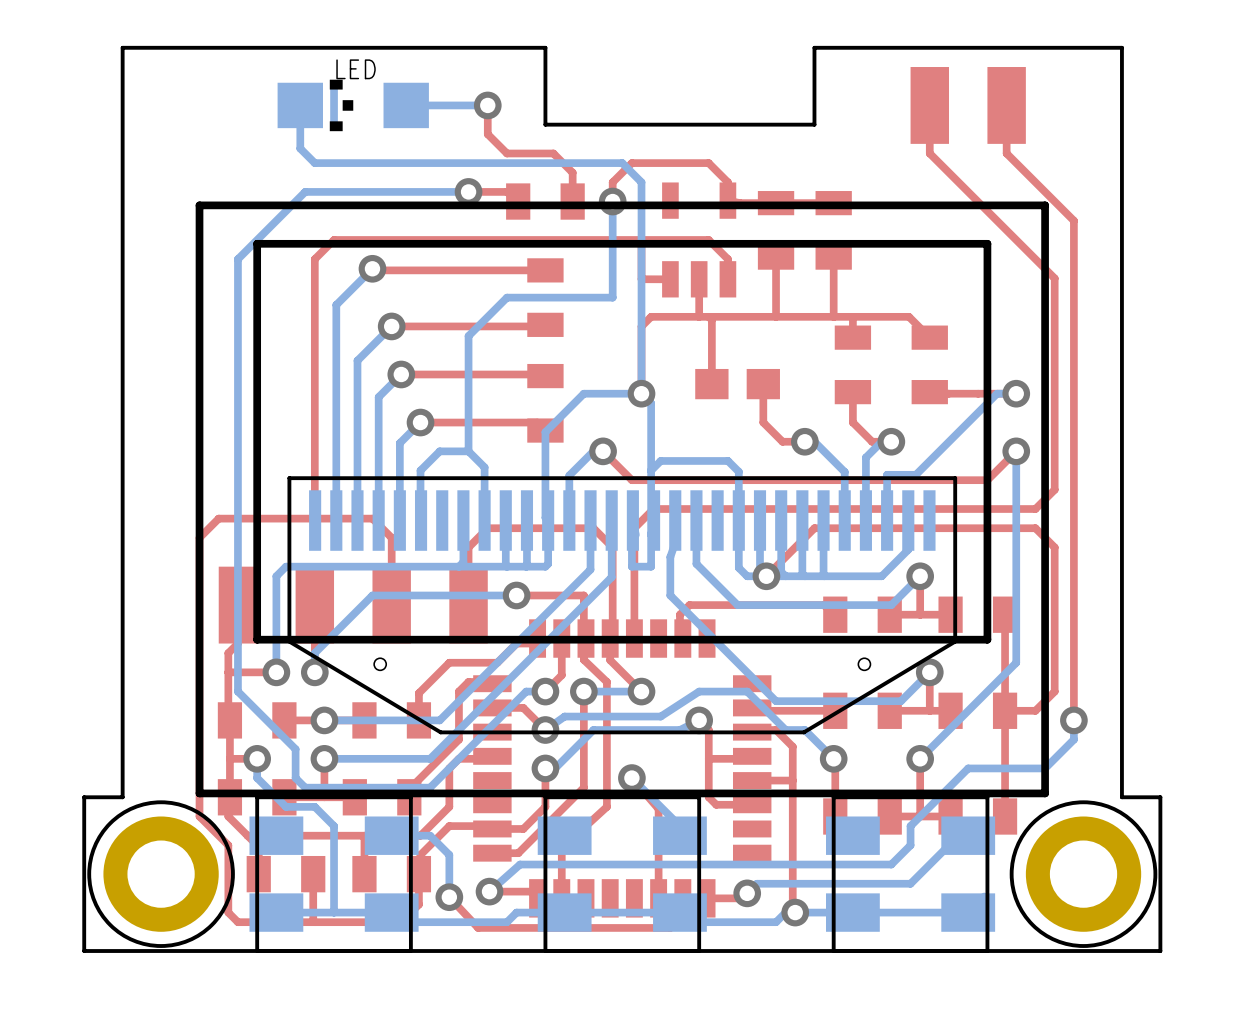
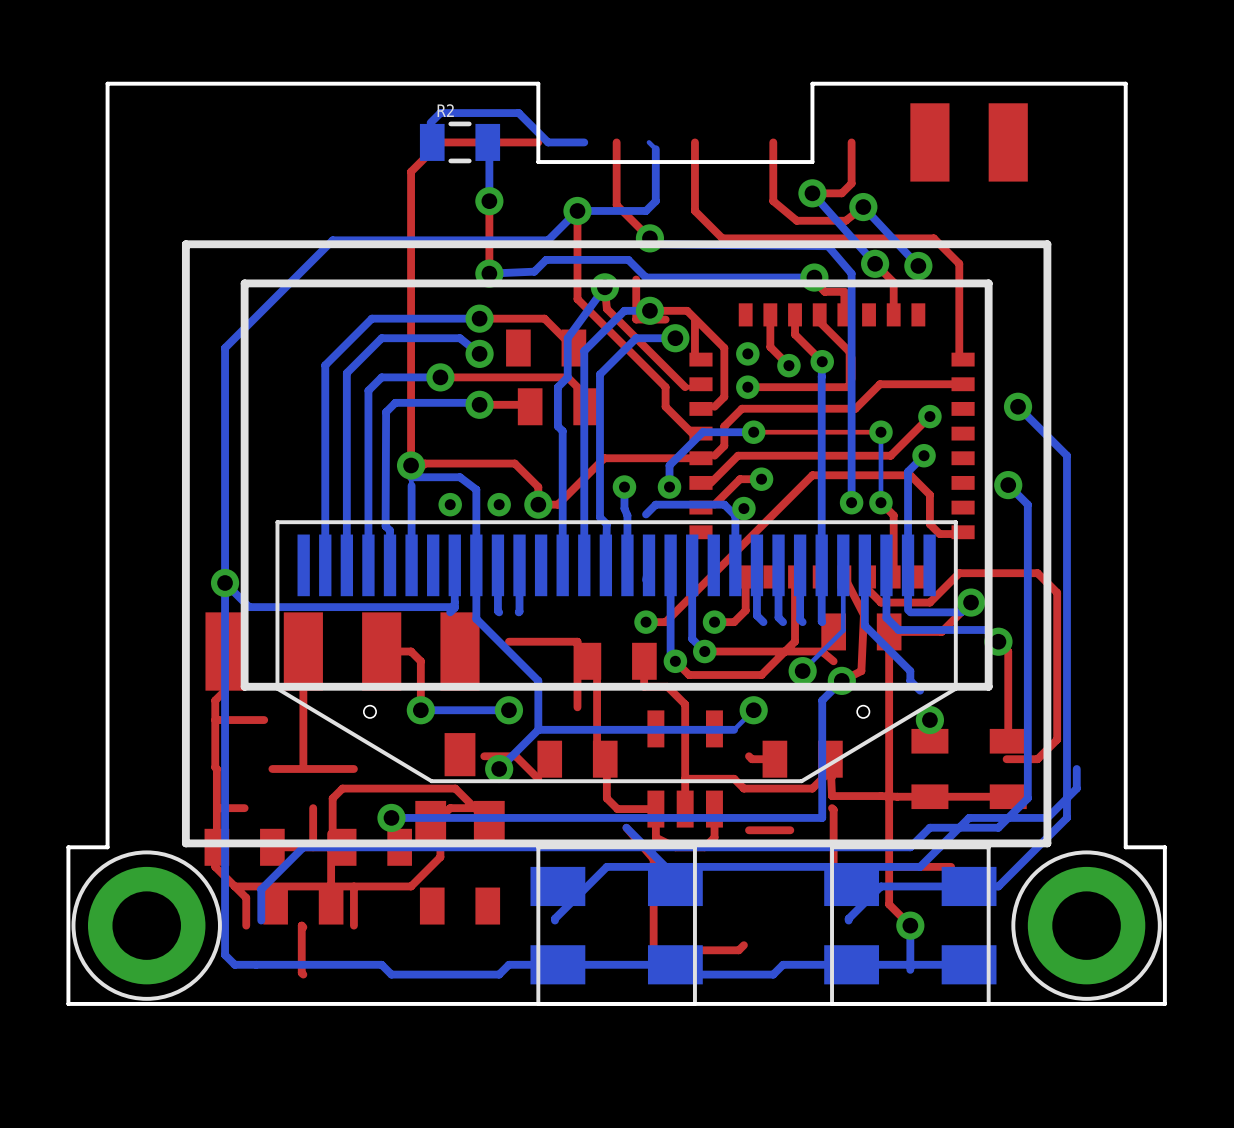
bottom track: (334, 86) (334, 124) -> none
bottom track: (300, 105) (300, 148) (314, 163) (622, 163) (641, 182) (641, 393) -> none
LED: (353, 105) -> none
bottom track: (487, 105) (406, 105) -> none
top track: (487, 105) (487, 134) (506, 153) (553, 153) (572, 172) (572, 201) -> none
via: (487, 105) -> none
bottom track: none -> (487, 142) (489, 201)
top track: none -> (538, 142) (440, 142) (411, 171) (411, 477) (424, 463) (514, 463) (538, 487) (538, 504) (557, 504) (604, 458) (700, 458) (703, 455) (714, 455) (724, 445) (724, 426) (741, 408) (855, 408) (879, 384) (963, 384)
bottom track: none -> (584, 142) (548, 142) (518, 113) (440, 113) (430, 122) (432, 142)
top track: none -> (616, 142) (616, 205) (649, 238)
top track: none -> (694, 142) (694, 210) (722, 238) (933, 238) (959, 263) (959, 355) (963, 359)
top track: none -> (773, 142) (773, 201) (796, 220) (845, 220) (863, 207)
top track: none -> (851, 142) (851, 183) (841, 193) (812, 193)
top track: (929, 105) (929, 153) (1054, 278) (1054, 489) (1035, 509) (653, 509) (634, 528) (634, 638) -> none
top track: (1006, 105) (1006, 153) (1073, 220) (1073, 720) -> none
bottom track: none -> (812, 193) (875, 263)
via: none -> (812, 193)
top track: none -> (489, 201) (489, 273)
via: none -> (489, 201)
bottom track: none -> (863, 207) (918, 265)
via: none -> (863, 207)
top track: none -> (577, 210) (577, 299) (665, 387) (665, 406) (692, 433) (700, 433)
via: none -> (577, 210)
bottom track: (468, 191) (305, 191) (237, 259) (237, 307) -> (649, 142) (655, 149) (655, 201) (646, 210) (577, 210) (548, 240) (332, 240) (225, 348)
top track: (468, 191) (506, 191) (518, 201) -> none
via: (468, 191) -> none
bottom track: none -> (649, 238) (655, 244) (828, 246) (851, 273) (851, 502)
via: none -> (649, 238)
part: (545, 201) -> none
bottom track: (612, 201) (612, 297) (506, 297) (468, 336) (468, 451) -> none
top track: (612, 201) (612, 182) (631, 163) (708, 163) (727, 182) (727, 200) (740, 203) (833, 203) -> none
via: (612, 201) -> none
top track: none -> (875, 263) (893, 282) (893, 314)
via: none -> (875, 263)
via: none -> (918, 265)
part: (776, 230) -> none
part: (833, 230) -> none
bottom track: none -> (489, 273) (534, 271) (546, 259) (628, 259) (646, 277) (814, 277)
via: none -> (489, 273)
top track: none -> (814, 277) (816, 283) (824, 291) (844, 291) (844, 314)
via: none -> (814, 277)
part position: (699, 239) -> (685, 768)
top track: none -> (604, 287) (606, 308) (685, 387) (698, 387) (700, 384)
via: none -> (604, 287)
top track: (776, 257) (776, 316) -> none
top track: (833, 257) (833, 316) -> none
bottom track: (372, 268) (336, 304) (336, 324) -> (479, 318) (371, 318) (325, 365)
top track: (372, 268) (374, 270) (545, 270) -> none
via: (372, 268) -> none
top track: none -> (649, 310) (647, 314) (651, 310) (687, 310) (724, 348) (724, 396) (714, 406) (703, 406) (700, 408)
via: none -> (649, 310)
top track: none -> (770, 314) (770, 347) (788, 365)
top track: none -> (795, 314) (795, 334) (822, 361)
top track: none -> (819, 314) (819, 321) (849, 351) (849, 387) (747, 387)
top track: none -> (479, 318) (544, 318) (573, 348)
via: none -> (479, 318)
top track: (727, 279) (727, 259) (708, 239) (334, 239) (314, 259) (314, 518) -> none
part rotation: 0° (545, 297) -> 90° clockwise (546, 348)
via: none -> (675, 338)
via: none -> (479, 353)
via: none -> (747, 353)
top track: (708, 316) (711, 319) (711, 384) -> none
bottom track: none -> (822, 361) (821, 565)
via: none -> (822, 361)
top track: (545, 324) (543, 326) (391, 326) -> none
via: none -> (788, 365)
bottom track: (391, 326) (357, 360) -> (479, 353) (460, 338) (381, 338) (346, 373) (346, 402)
via: (391, 326) -> none
top track: none -> (440, 377) (567, 377) (585, 395) (585, 406)
via: none -> (440, 377)
top track: (929, 337) (908, 316) (651, 316) (641, 326) (641, 393) -> none
via: none -> (747, 387)
top track: none -> (479, 404) (520, 404) (530, 406)
via: none -> (479, 404)
part: (852, 364) -> none
part: (929, 364) -> none
bottom track: none -> (1018, 406) (1066, 455) (1066, 817) (998, 886) (969, 886)
via: none -> (1018, 406)
bottom track: (401, 374) (378, 397) -> (440, 377) (381, 377) (368, 390) (368, 439)
top track: (401, 374) (543, 374) (545, 376) -> none
via: (401, 374) -> none
top track: none -> (929, 416) (890, 455) (738, 455) (710, 482) (700, 482)
via: none -> (929, 416)
part: (737, 384) -> none
top track: (763, 384) (763, 422) (782, 441) (804, 441) -> none
bottom track: none -> (753, 432) (702, 432) (669, 465) (669, 487)
via: none -> (753, 432)
bottom track: none -> (880, 432) (880, 502)
top track: none -> (880, 432) (753, 432)
via: none -> (880, 432)
top track: (852, 392) (852, 422) (872, 441) (891, 441) -> none
top track: (929, 392) (1016, 393) -> none
bottom track: (641, 393) (651, 403) (651, 566) (631, 566) (632, 520) (635, 534) -> none
bottom track: (641, 393) (583, 393) (545, 432) (545, 517) (548, 520) (548, 563) (545, 566) (285, 566) (276, 576) (276, 672) -> none
via: (641, 393) -> none
bottom track: (1016, 393) (997, 393) (915, 474) (887, 474) (887, 520) -> (998, 641) (986, 629) (898, 629) (886, 617) (886, 565)
via: (1016, 393) -> none
part rotation: 0° (545, 403) -> 90° clockwise (557, 406)
part: none -> (832, 445)
bottom track: none -> (924, 455) (908, 471) (908, 565)
via: none -> (924, 455)
bottom track: (420, 422) (399, 443) (399, 486) -> (479, 404) (469, 402) (395, 402) (386, 412) (385, 526) (390, 530)
top track: (420, 422) (537, 422) (545, 430) -> none
top track: none -> (761, 479) (740, 479) (714, 504) (703, 504) (700, 507)
via: none -> (761, 479)
bottom track: (804, 441) (814, 441) (844, 472) (844, 520) -> (802, 671) (843, 630) (843, 565)
via: (804, 441) -> none
bottom track: (891, 441) (881, 441) (865, 457) (865, 520) -> (920, 690) (910, 680) (910, 671) (864, 625) (864, 565)
via position: (891, 441) -> (880, 502)
bottom track: none -> (1008, 485) (1027, 504) (1027, 798) (998, 827) (929, 827) (910, 847) (303, 847) (261, 889) (261, 920)
bottom track: none -> (624, 487) (624, 508) (627, 515) (627, 565)
via: none -> (624, 487)
via: none -> (669, 487)
bottom track: (468, 451) (439, 451) (420, 470) (421, 520) -> (476, 511) (476, 489) (460, 477) (411, 477) (411, 565)
bottom track: (468, 451) (484, 467) -> none
bottom track: (603, 451) (593, 451) (569, 475) -> (604, 287) (567, 338) (567, 377) (557, 387) (557, 426) (562, 431) (562, 519)
via: (603, 451) -> none
bottom track: (1016, 451) (1016, 662) (920, 758) -> none
top track: (1016, 451) (987, 480) (631, 480) (603, 451) -> none
via position: (1016, 451) -> (1008, 485)
via: none -> (851, 502)
top track: none -> (880, 502) (893, 515) (893, 576)
via: none -> (450, 504)
via: none -> (499, 504)
via: none -> (538, 504)
via: none -> (743, 508)
top track: none -> (963, 532) (961, 534) (939, 534) (929, 524) (929, 494) (910, 475) (812, 475) (665, 622) (646, 622)
bottom track: none -> (476, 565) (476, 618) (538, 680) (538, 729)
bottom track: (590, 520) (590, 569) (439, 720) (324, 720) -> (584, 565) (584, 351) (624, 310) (649, 310)
bottom track: (611, 520) (611, 577) (430, 758) (324, 758) -> (605, 565) (606, 524) (599, 517) (599, 374) (636, 338) (675, 338)
bottom track: (738, 520) (738, 567) (747, 576) (881, 576) (908, 549) -> (971, 602) (961, 612) (910, 612) (908, 610) (908, 595)
top track: (958, 528) (814, 528) (766, 576) -> (959, 573) (929, 602) (880, 602) (869, 590) (869, 576)
top track: none -> (745, 576) (745, 610) (734, 622) (714, 622)
top track: none -> (795, 576) (795, 641) (761, 675) (689, 675) (675, 661)
top track: none -> (844, 576) (863, 614) (861, 671) (841, 680)
bottom track: none -> (225, 582) (249, 607) (454, 607)
via: none -> (225, 582)
bottom track: (675, 542) (670, 557) (670, 595) (776, 701) (900, 701) (929, 672) -> (670, 587) (670, 656) (675, 661)
top track: none -> (971, 602) (941, 631) (889, 631) (889, 904) (910, 925)
via: none -> (971, 602)
bottom track: (696, 563) (737, 605) (891, 605) (920, 576) -> (692, 609) (692, 638) (704, 651)
via: none -> (646, 622)
via: none -> (714, 622)
via: (766, 576) -> none
top track: (920, 576) (920, 614) -> none
via: (920, 576) -> none
bottom track: (516, 595) (372, 595) (314, 653) (314, 672) -> none
via: (516, 595) -> none
top track: none -> (998, 641) (1008, 651) (1008, 741)
via: none -> (998, 641)
top track: (391, 605) (391, 537) (372, 518) (218, 518) (199, 537) (199, 816) (228, 845) (228, 912) (237, 922) (401, 922) (418, 904) (420, 854) (449, 826) (489, 826) (492, 828) (523, 828) (545, 806) (545, 768) -> (381, 651) (411, 651) (420, 661) (420, 710)
top track: (708, 605) (689, 605) (679, 614) (679, 635) (682, 638) -> none
via: none -> (704, 651)
top track: (478, 614) (468, 605) (468, 547) (487, 528) (593, 528) (612, 547) (612, 636) (610, 638) (610, 660) (641, 691) -> none
top track: none -> (588, 661) (587, 661) (597, 671) (597, 757) (606, 760) (606, 798) (617, 809) (655, 809) (655, 837) (675, 847) (704, 847) (714, 837) (714, 809)
part: none -> (616, 661)
top track: none -> (644, 661) (644, 686) (667, 686) (685, 704) (685, 809)
via: none -> (675, 661)
part position: (862, 614) -> (861, 631)
top track: (881, 614) (950, 614) (950, 616) -> none
part: (977, 614) -> none
top track: (1005, 614) (1005, 816) -> none
via: none -> (802, 671)
via: none -> (841, 680)
top track: (537, 638) (532, 643) (516, 643) (497, 662) (449, 662) (418, 693) (418, 720) -> none
top track: (561, 638) (561, 675) (545, 691) -> none
top track: (585, 638) (583, 659) (606, 681) (606, 806) (561, 848) (561, 898) -> none
via: none -> (420, 710)
bottom track: none -> (508, 710) (420, 710)
via: none -> (508, 710)
bottom track: none -> (753, 710) (734, 729) (538, 729)
via: none -> (753, 710)
via: (276, 672) -> none
top track: none -> (303, 720) (303, 764)
via: (314, 672) -> none
bottom track: none -> (538, 729) (499, 768)
top track: (492, 683) (490, 681) (468, 681) (458, 691) (458, 739) (409, 789) (409, 797) -> none
bottom track: (545, 691) (526, 691) (430, 787) (305, 787) (295, 778) (295, 749) (237, 691) -> (244, 964) (234, 964) (225, 955) (225, 739)
via: (545, 691) -> none
top track: (583, 691) (583, 787) (518, 853) (492, 853) -> none
via: (583, 691) -> none
bottom track: (641, 691) (583, 691) -> none
via: (641, 691) -> none
top track: (929, 693) (929, 710) -> none
part: none -> (577, 759)
part: none -> (802, 759)
top track: none -> (830, 759) (832, 796) (1008, 796)
top track: none -> (830, 759) (830, 770) (812, 788) (743, 788) (734, 778) (685, 778)
top track: (835, 710) (777, 710) -> none
part: (862, 710) -> none
top track: (950, 710) (889, 710) -> none
part: (977, 710) -> none
R2 side: top (257, 720) -> bottom (460, 142)
via: (324, 720) -> none
part: (391, 720) -> none
via: none -> (499, 768)
bottom track: (699, 720) (679, 730) (593, 730) (555, 768) -> (841, 680) (822, 700) (822, 817) (548, 817)
top track: (699, 720) (708, 730) (708, 797) (716, 804) (752, 804) -> none
via: (699, 720) -> none
part: none -> (929, 768)
part: none -> (1008, 768)
via: (1073, 720) -> none
bottom track: (545, 730) (564, 716) (660, 716) (699, 691) (747, 691) (785, 730) (804, 730) (833, 758) -> none
via: (545, 730) -> none
top track: (752, 732) (754, 730) (776, 730) (792, 746) (792, 910) (795, 912) -> none
part: none -> (460, 788)
top track: (752, 756) (749, 758) (708, 758) -> none
bottom track: (257, 758) (257, 778) (285, 806) (314, 806) (334, 826) (334, 912) -> none
via: (257, 758) -> none
via: (324, 758) -> none
via: (833, 758) -> none
top track: (920, 758) (920, 816) -> none
via: (920, 758) -> none
via: none -> (391, 817)
bottom track: none -> (538, 817) (391, 817)
via: (545, 768) -> none
part: (622, 768) -> none
top track: none -> (489, 822) (455, 788) (342, 788) (332, 798) (331, 906)
via: (631, 778) -> none
part: (862, 816) -> none
bottom track: (920, 816) (910, 826) (910, 845) (891, 864) (520, 864) (489, 891) -> (920, 866) (606, 866) (554, 920)
part: (977, 816) -> none
bottom track: (391, 835) (430, 835) (449, 854) (449, 897) -> none
bottom track: (958, 835) (910, 883) (756, 883) (747, 893) -> (959, 886) (880, 886) (848, 920)
part: none -> (460, 906)
part position: (285, 874) -> (303, 906)
part: (334, 874) -> none
part: (391, 874) -> none
bottom track: none -> (910, 925) (910, 969)
via: none -> (910, 925)
via: (489, 891) -> none
top track: (537, 891) (537, 898) (530, 891) (489, 891) -> none
via: (747, 893) -> none
top track: (449, 897) (478, 927) (670, 927) (682, 919) (682, 898) -> none
via: (449, 897) -> none
via: (795, 912) -> none

